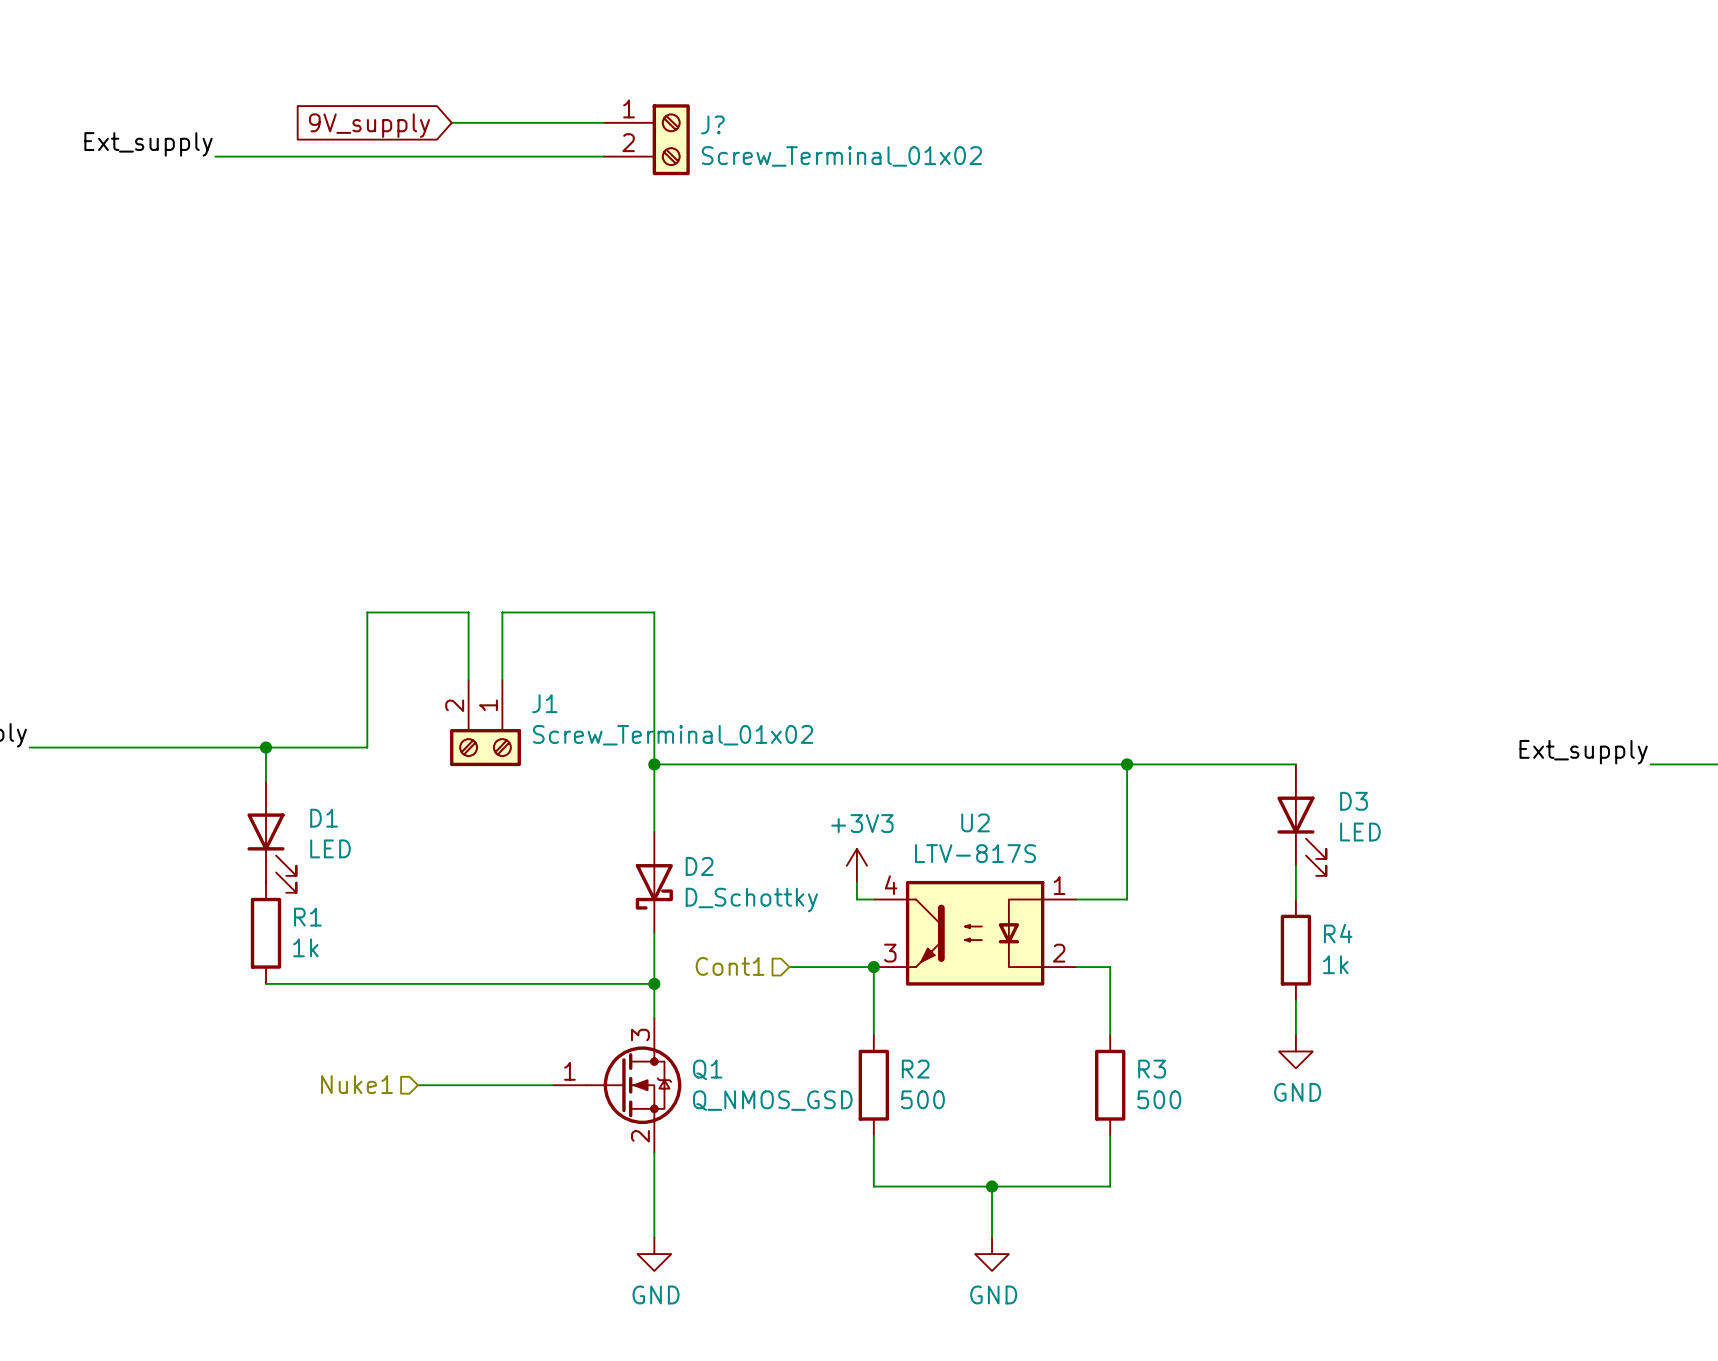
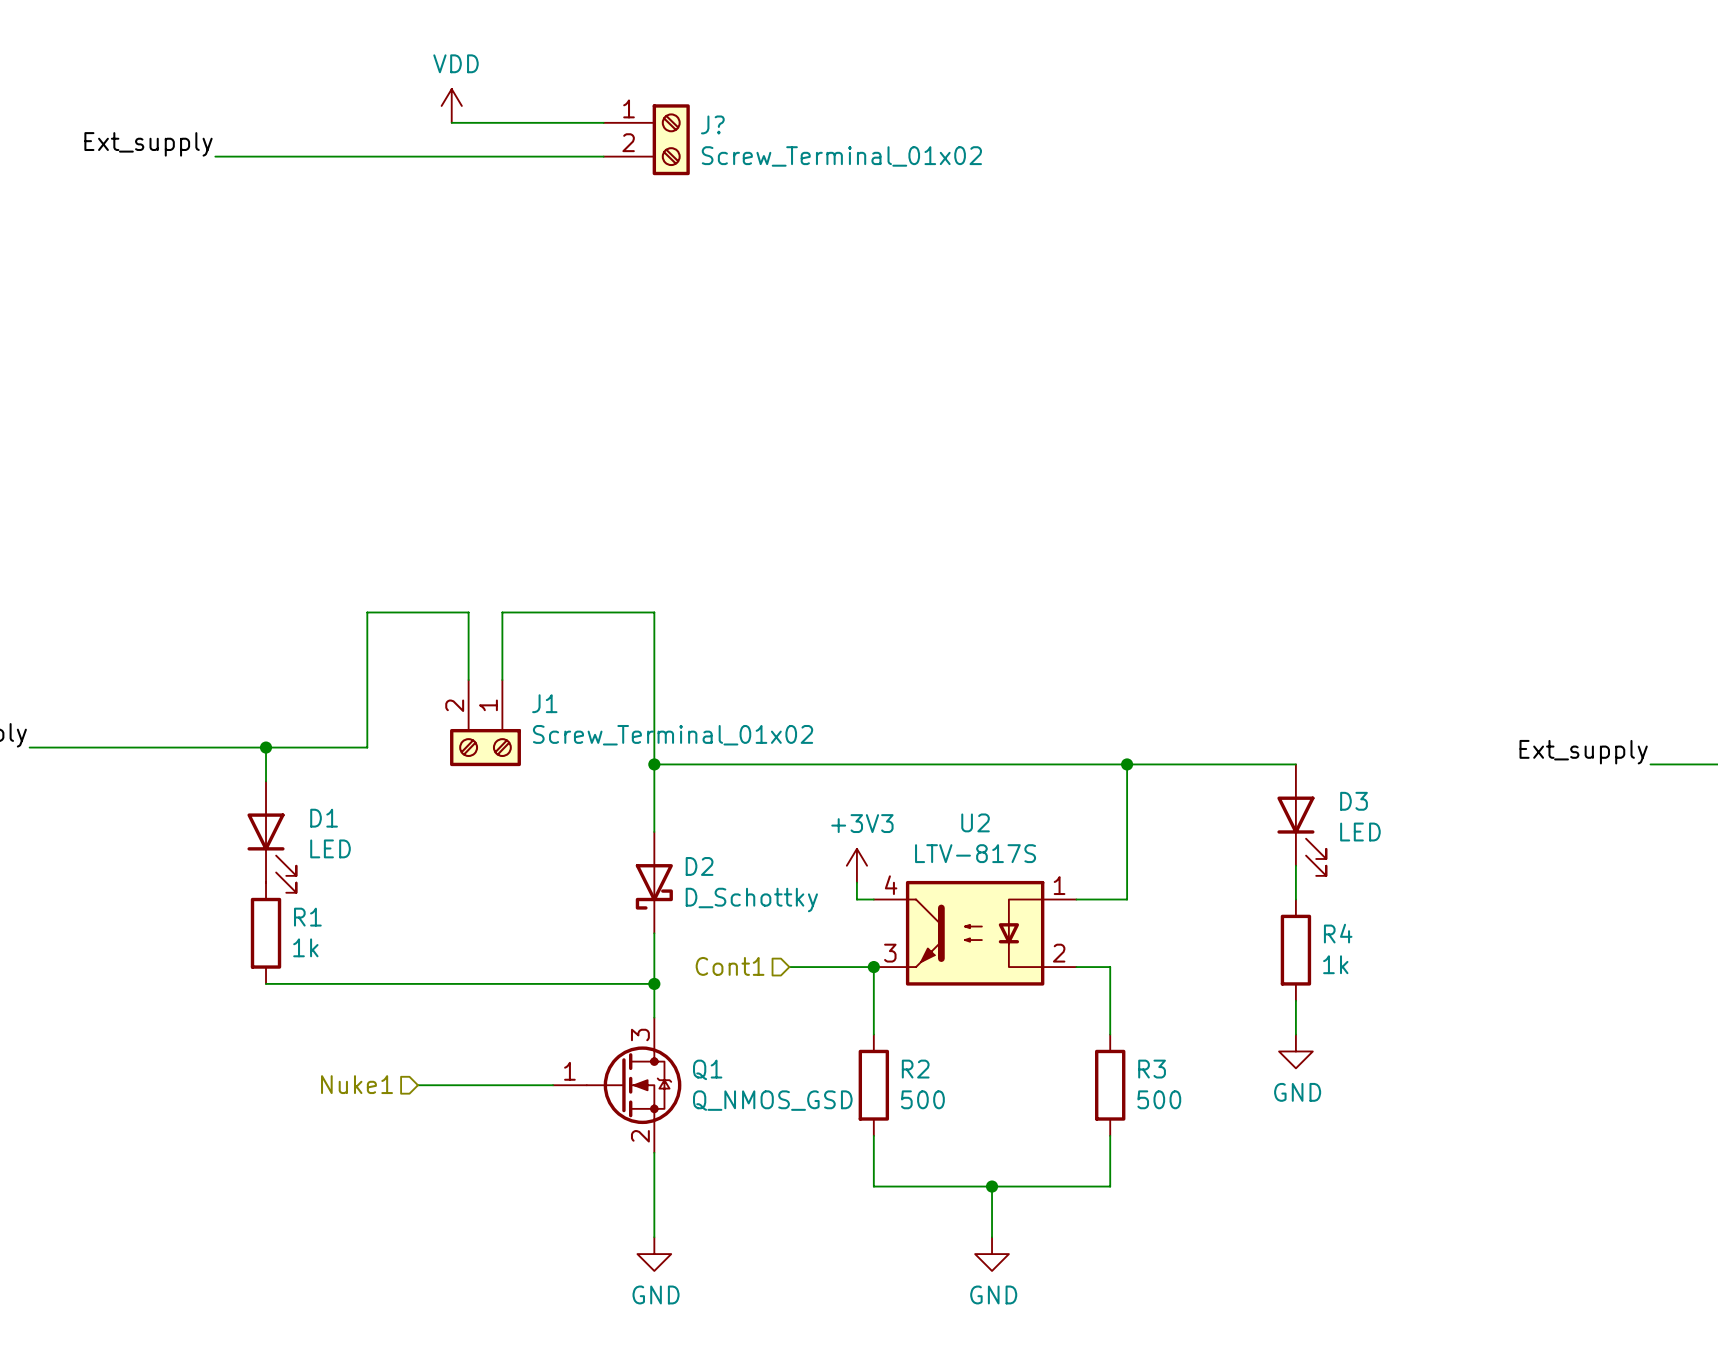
power symbol: none -> VDD (451, 105)
global label: 9V_supply (369, 125) -> none

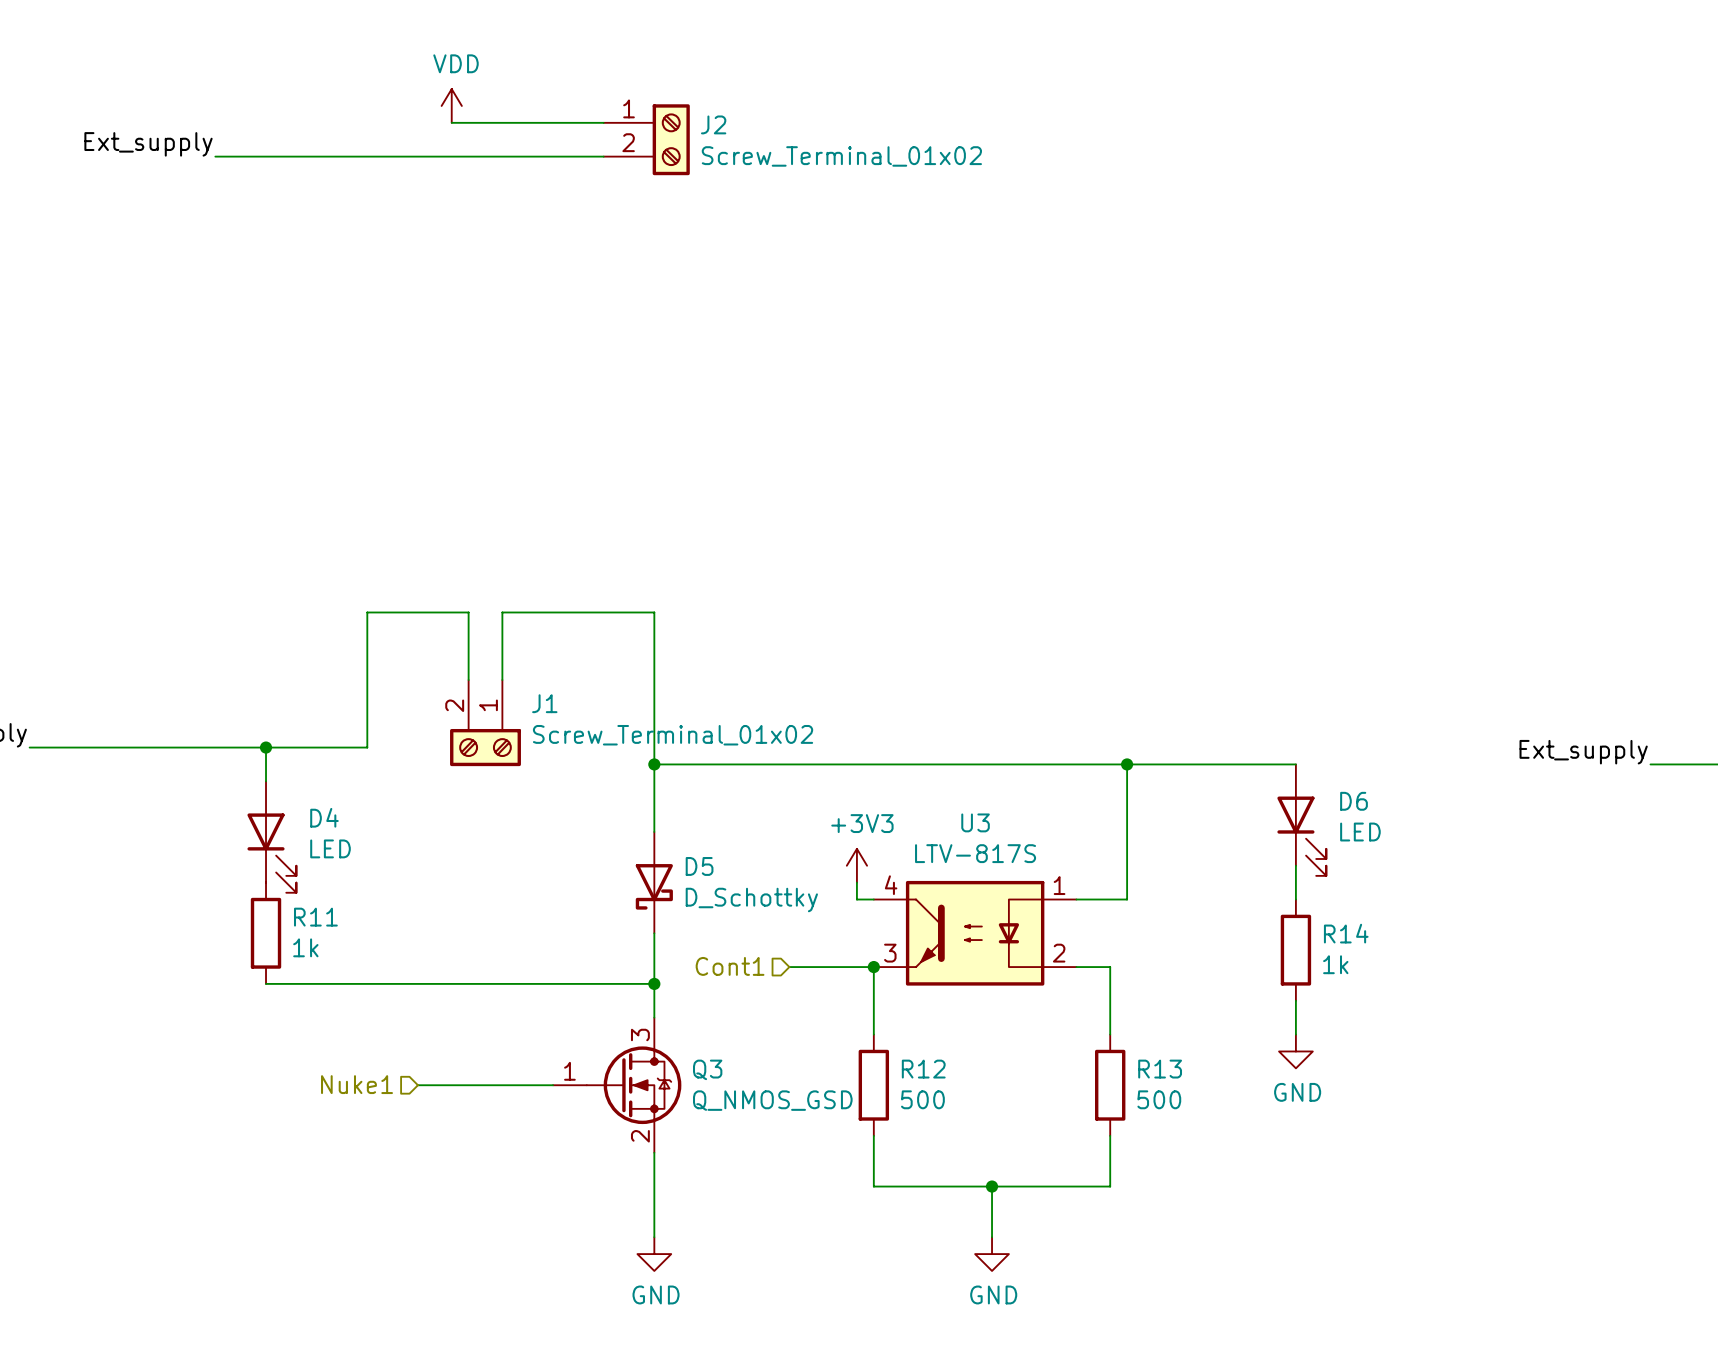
J? name: J? (712, 124) -> J2 (713, 124)
D3 name: D3 (1354, 801) -> D6 (1354, 801)
D1 name: D1 (324, 818) -> D4 (324, 817)
U2 name: U2 (975, 822) -> U3 (975, 822)
D2 name: D2 (699, 866) -> D5 (699, 866)
R1 name: R1 (307, 917) -> R11 (315, 917)
R4 name: R4 (1338, 933) -> R14 (1346, 933)
Q1 name: Q1 (707, 1069) -> Q3 (707, 1069)
R2 name: R2 (915, 1069) -> R12 (923, 1069)
R3 name: R3 (1152, 1069) -> R13 (1160, 1069)

